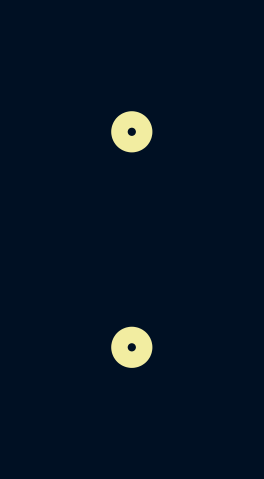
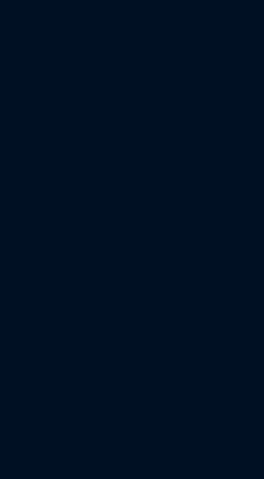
part: (131, 131) -> none
part: (131, 347) -> none

